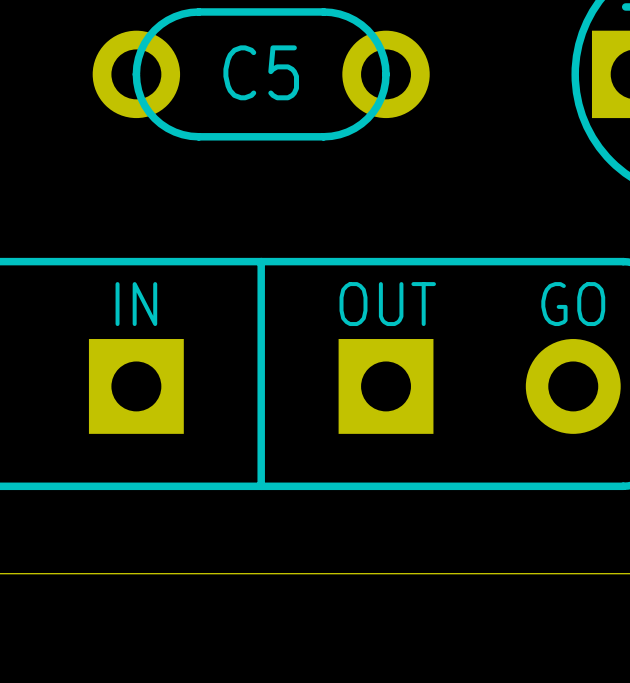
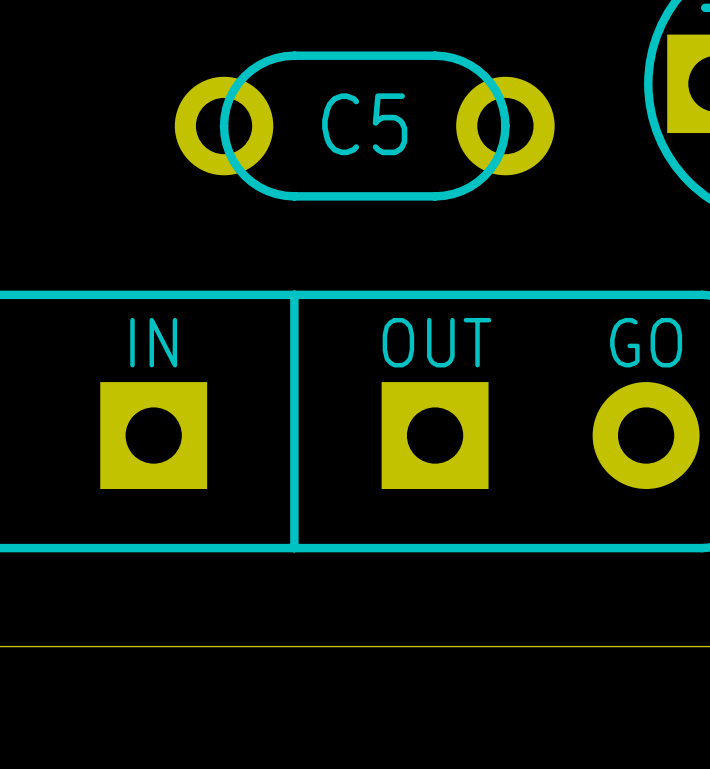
C5 position: (261, 74) -> (364, 126)

